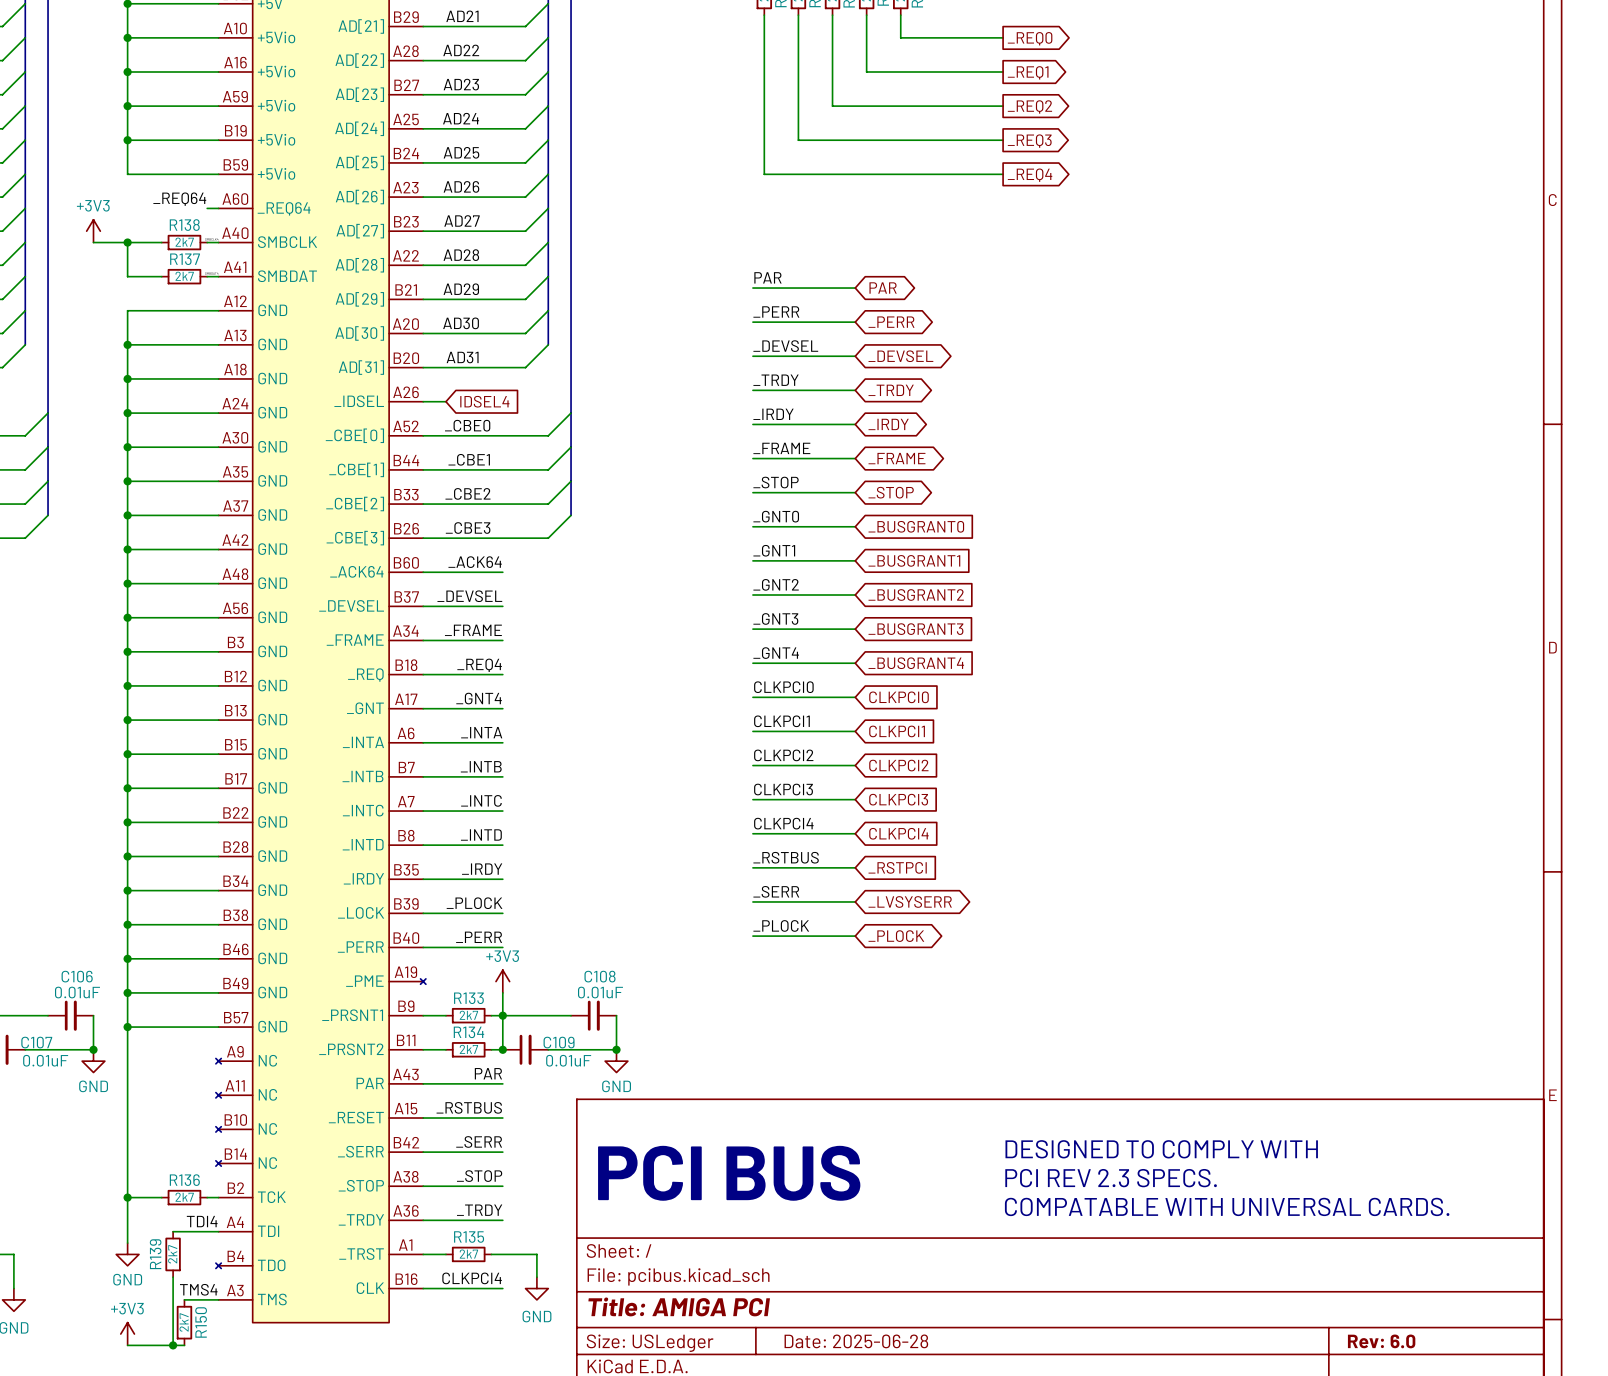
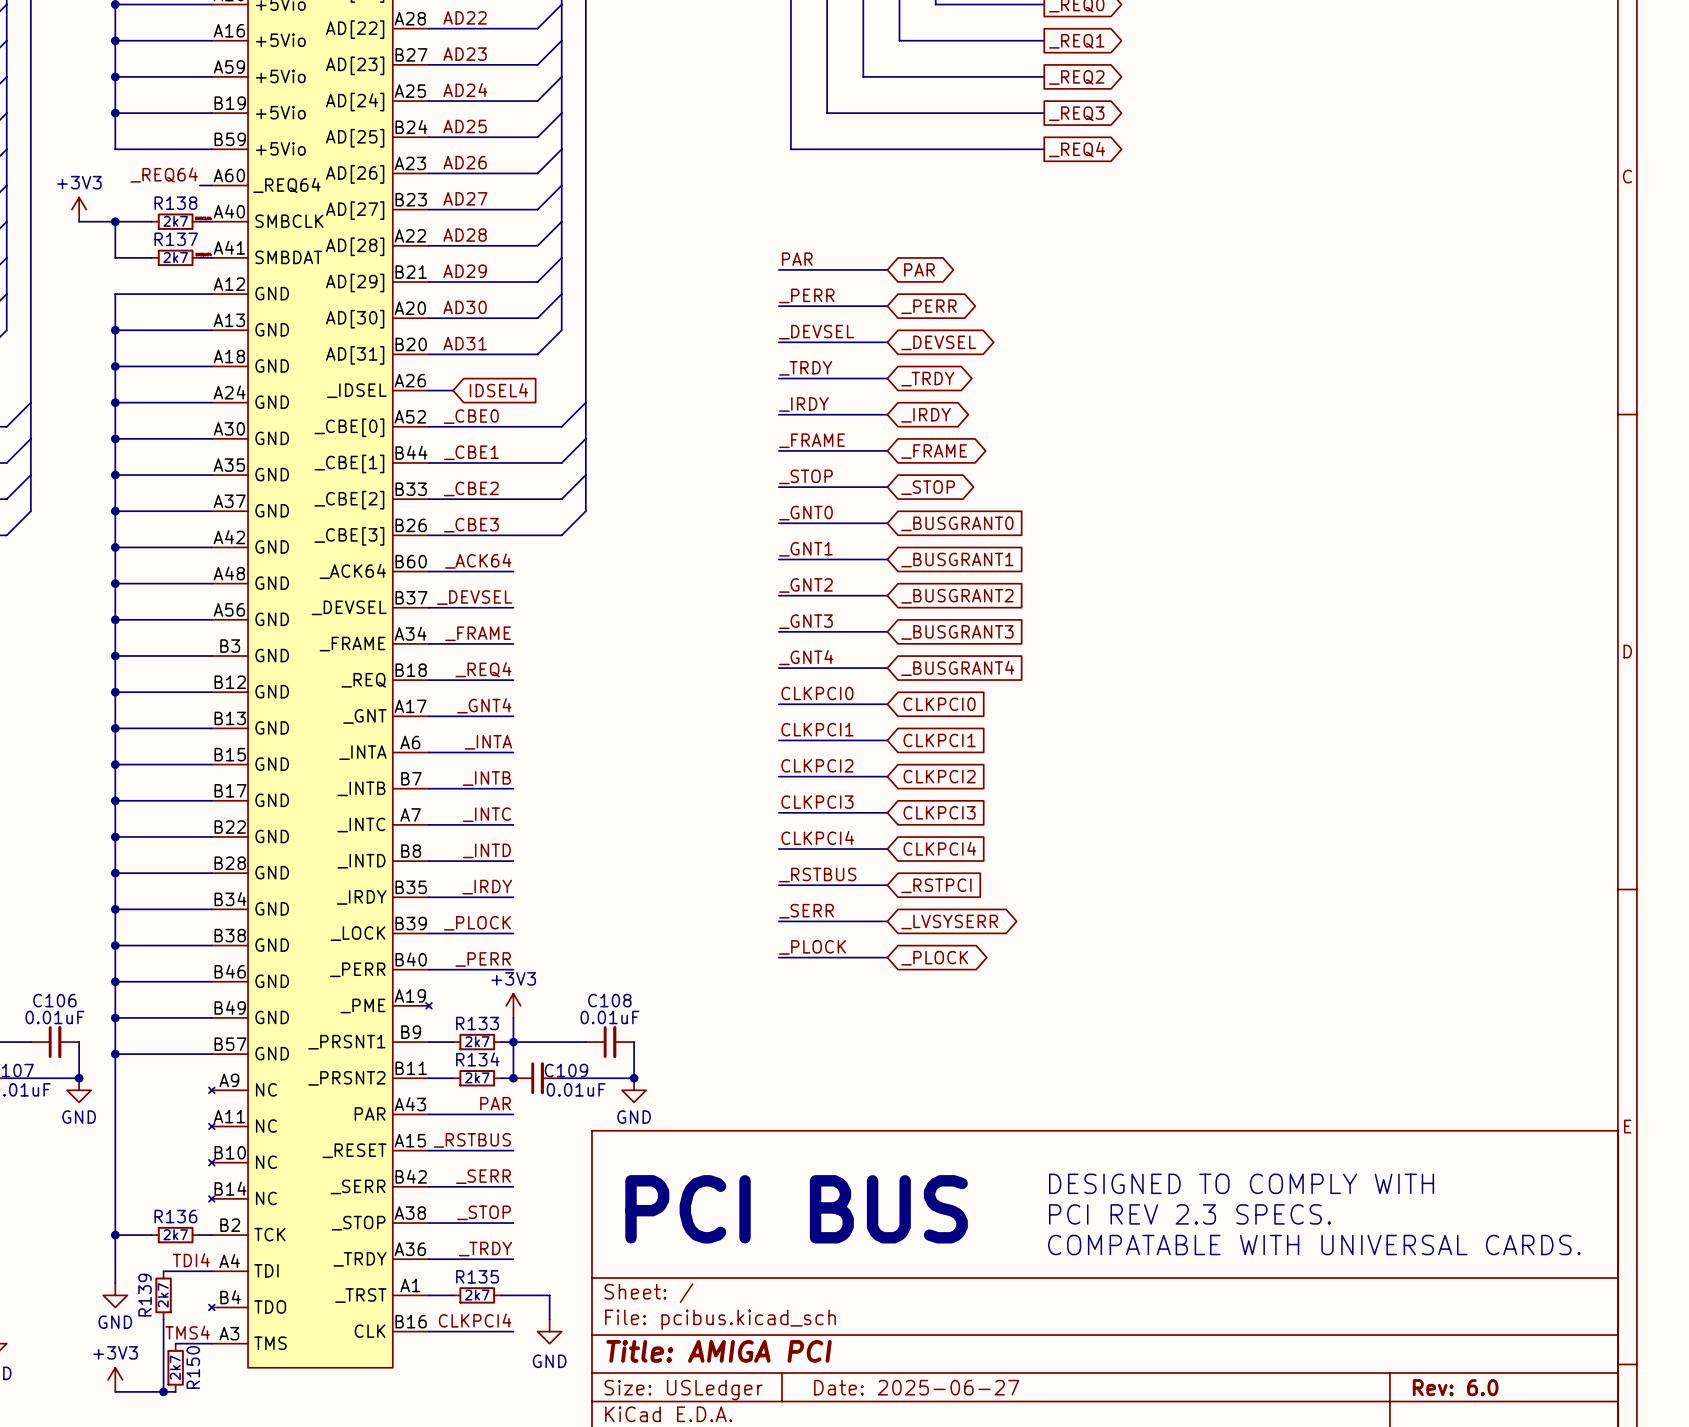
title block: Date: 2025-06-28 (856, 1341) -> Date: 2025-06-27 (916, 1387)

